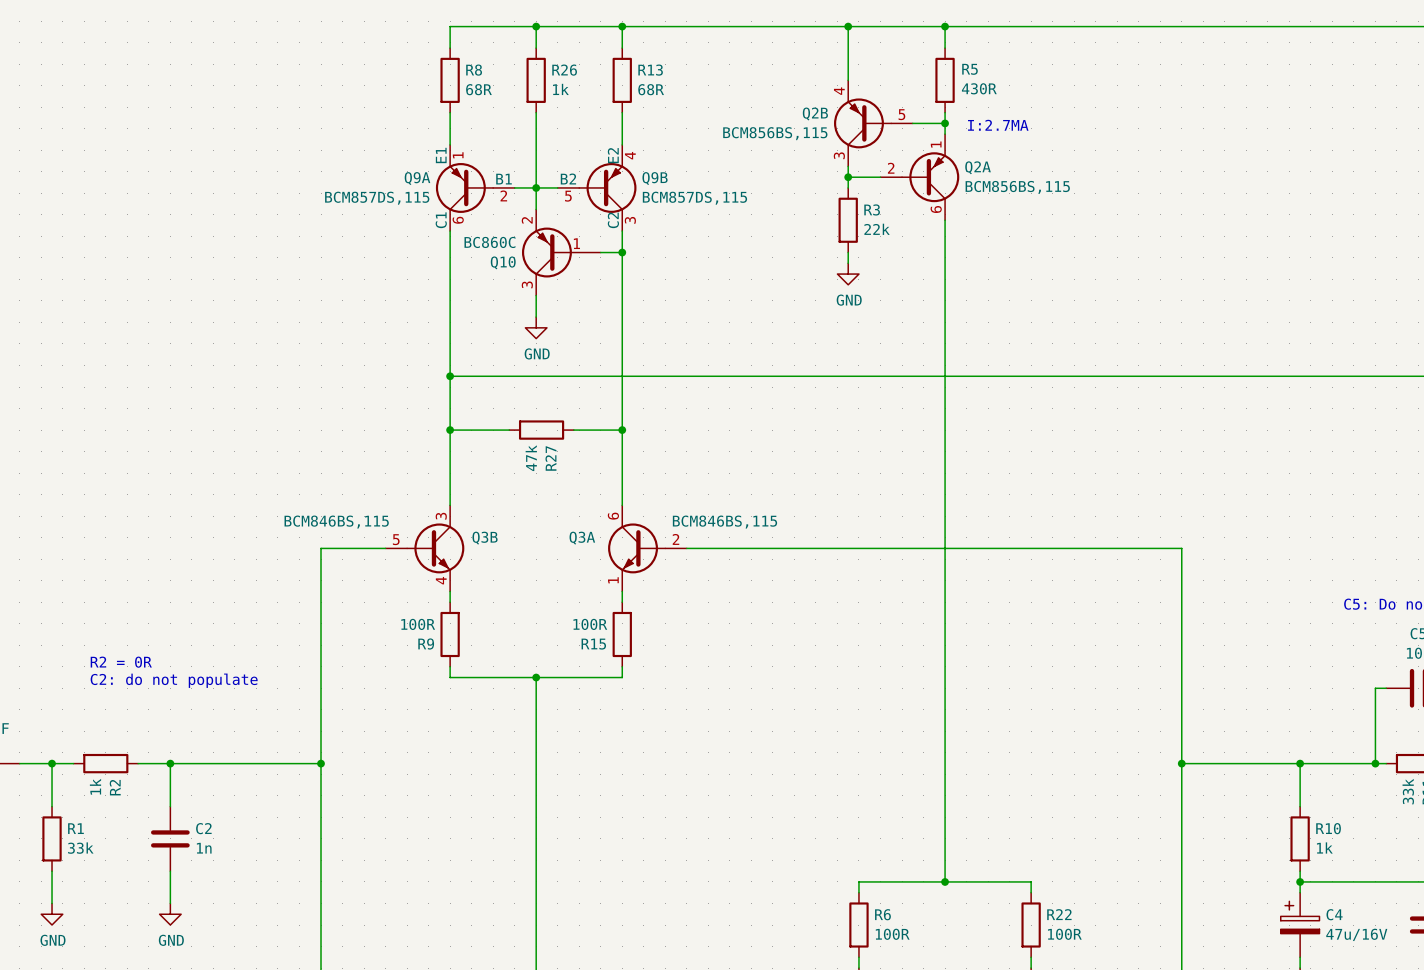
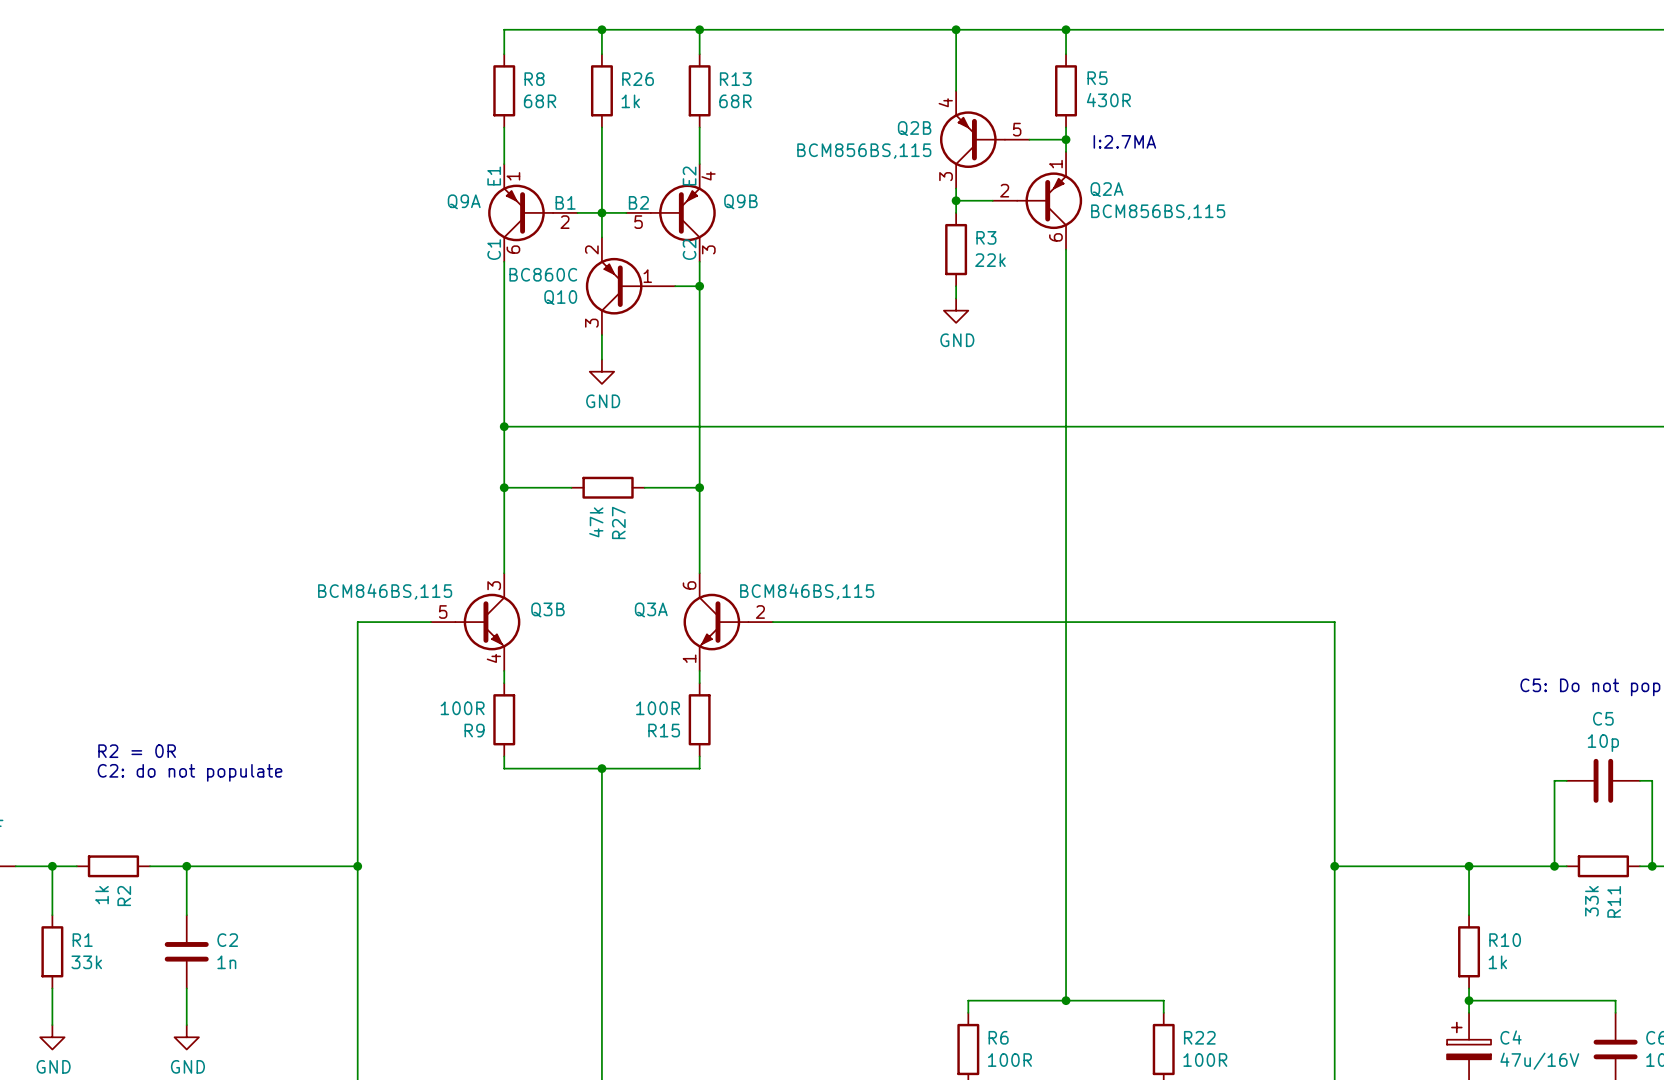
Q9A value: BCM857DS,115 (377, 198) -> none
Q9B value: BCM857DS,115 (694, 198) -> none

